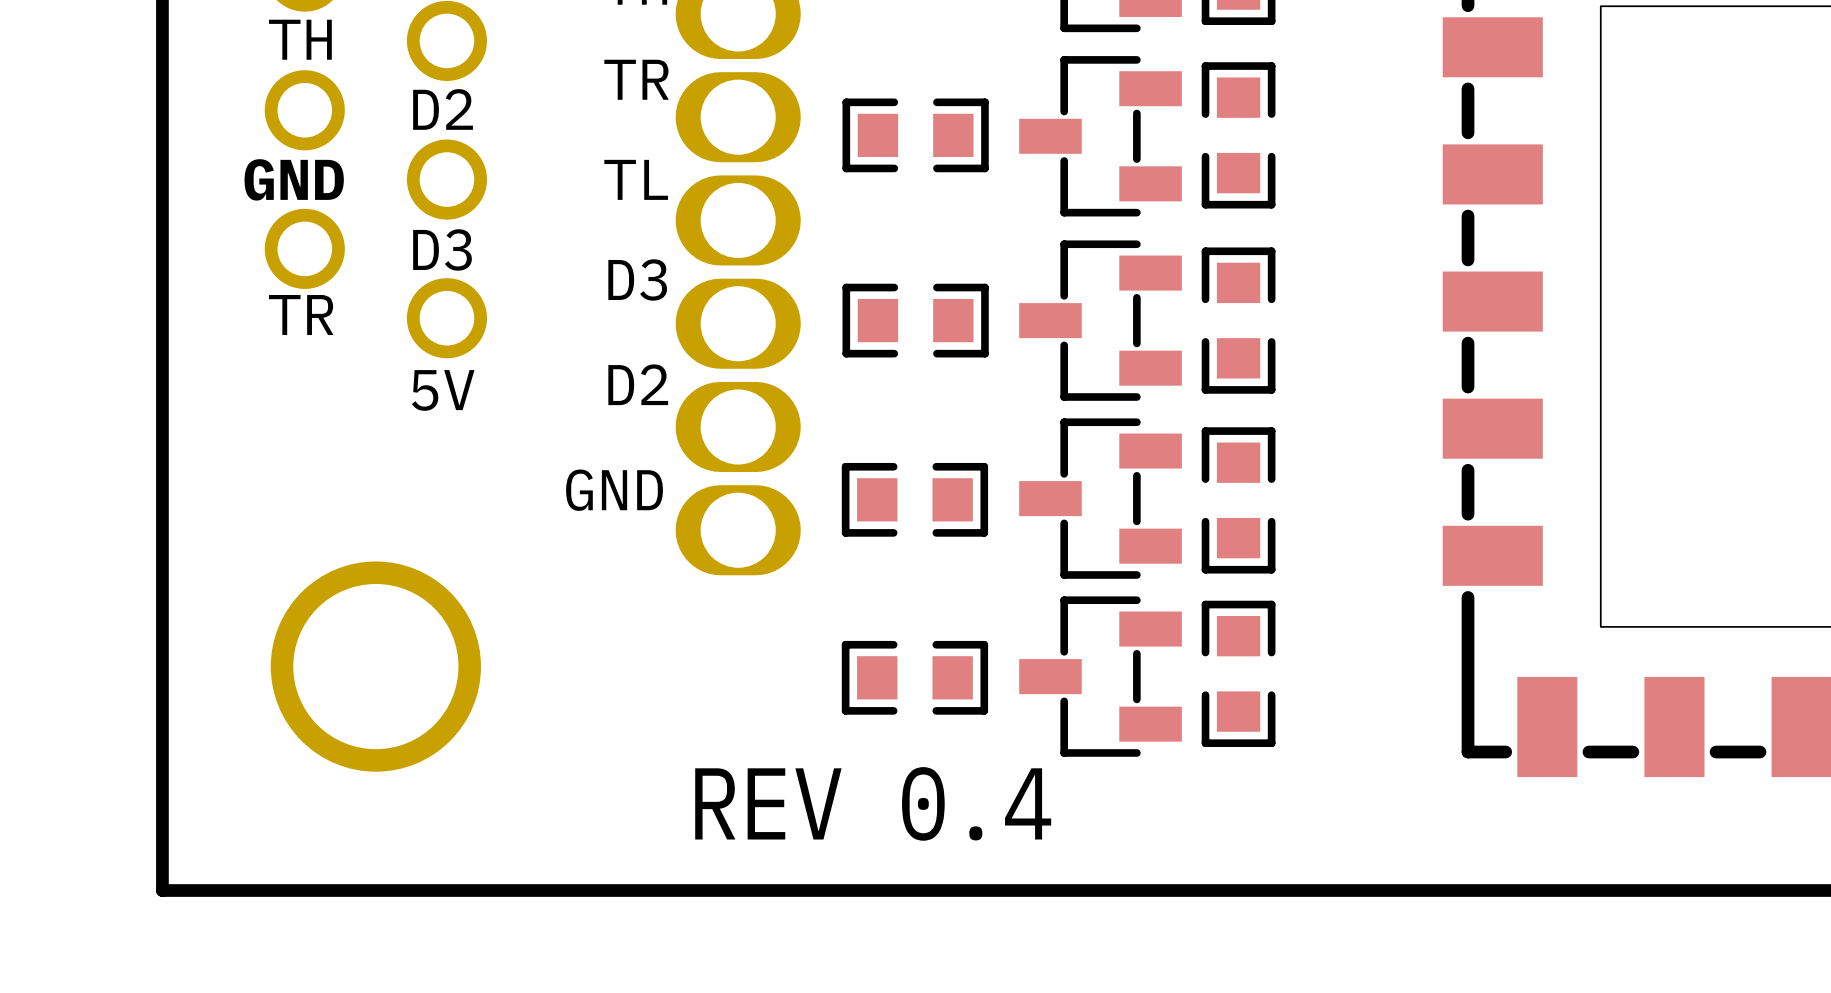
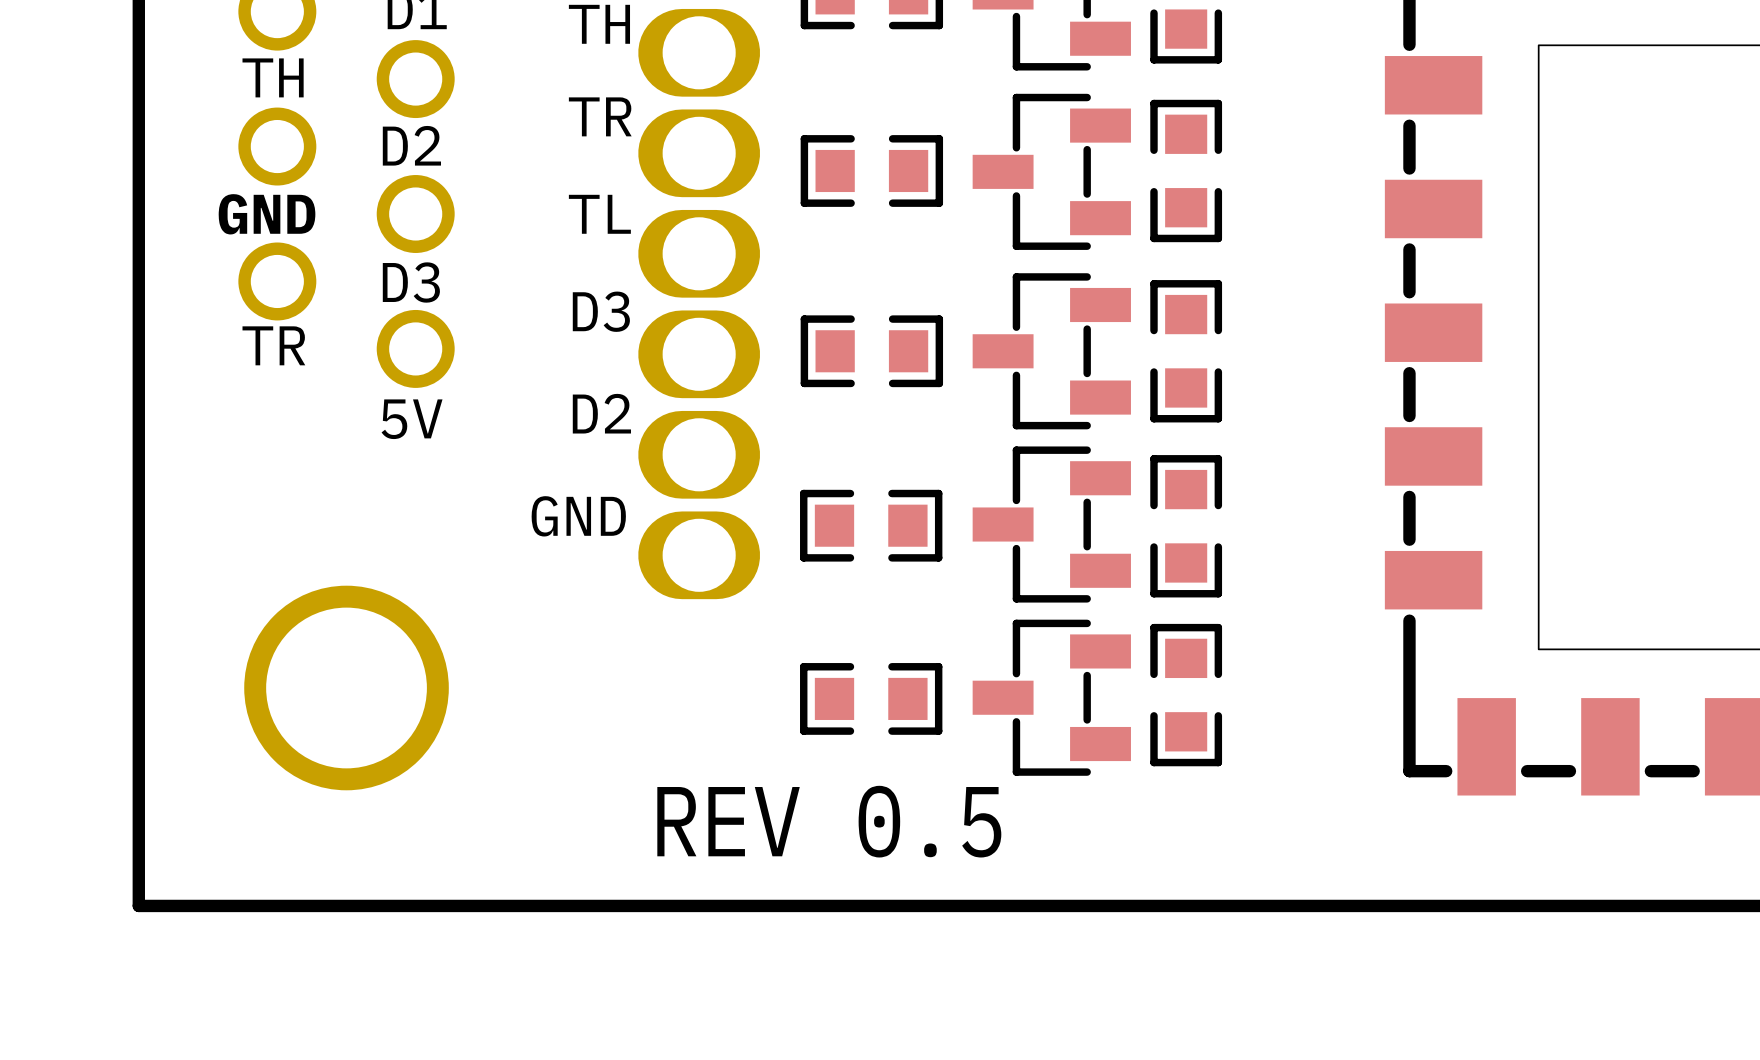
text: REV 0.4 (873, 803) -> REV 0.5 (829, 821)

